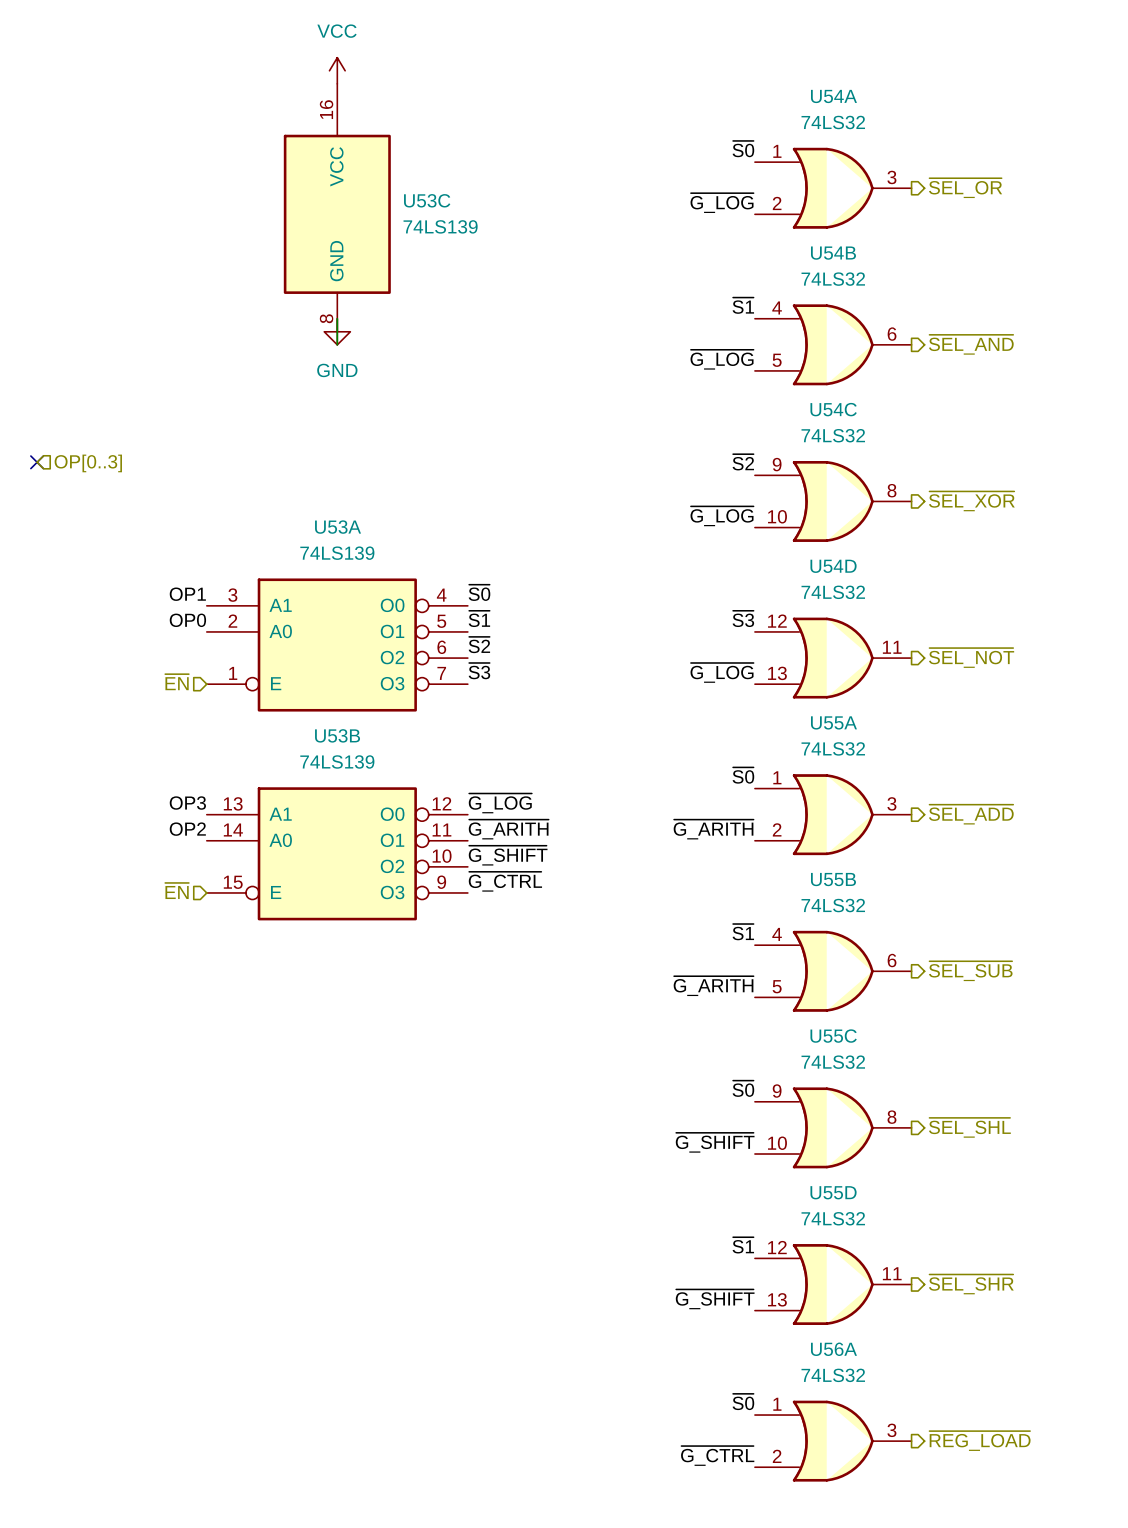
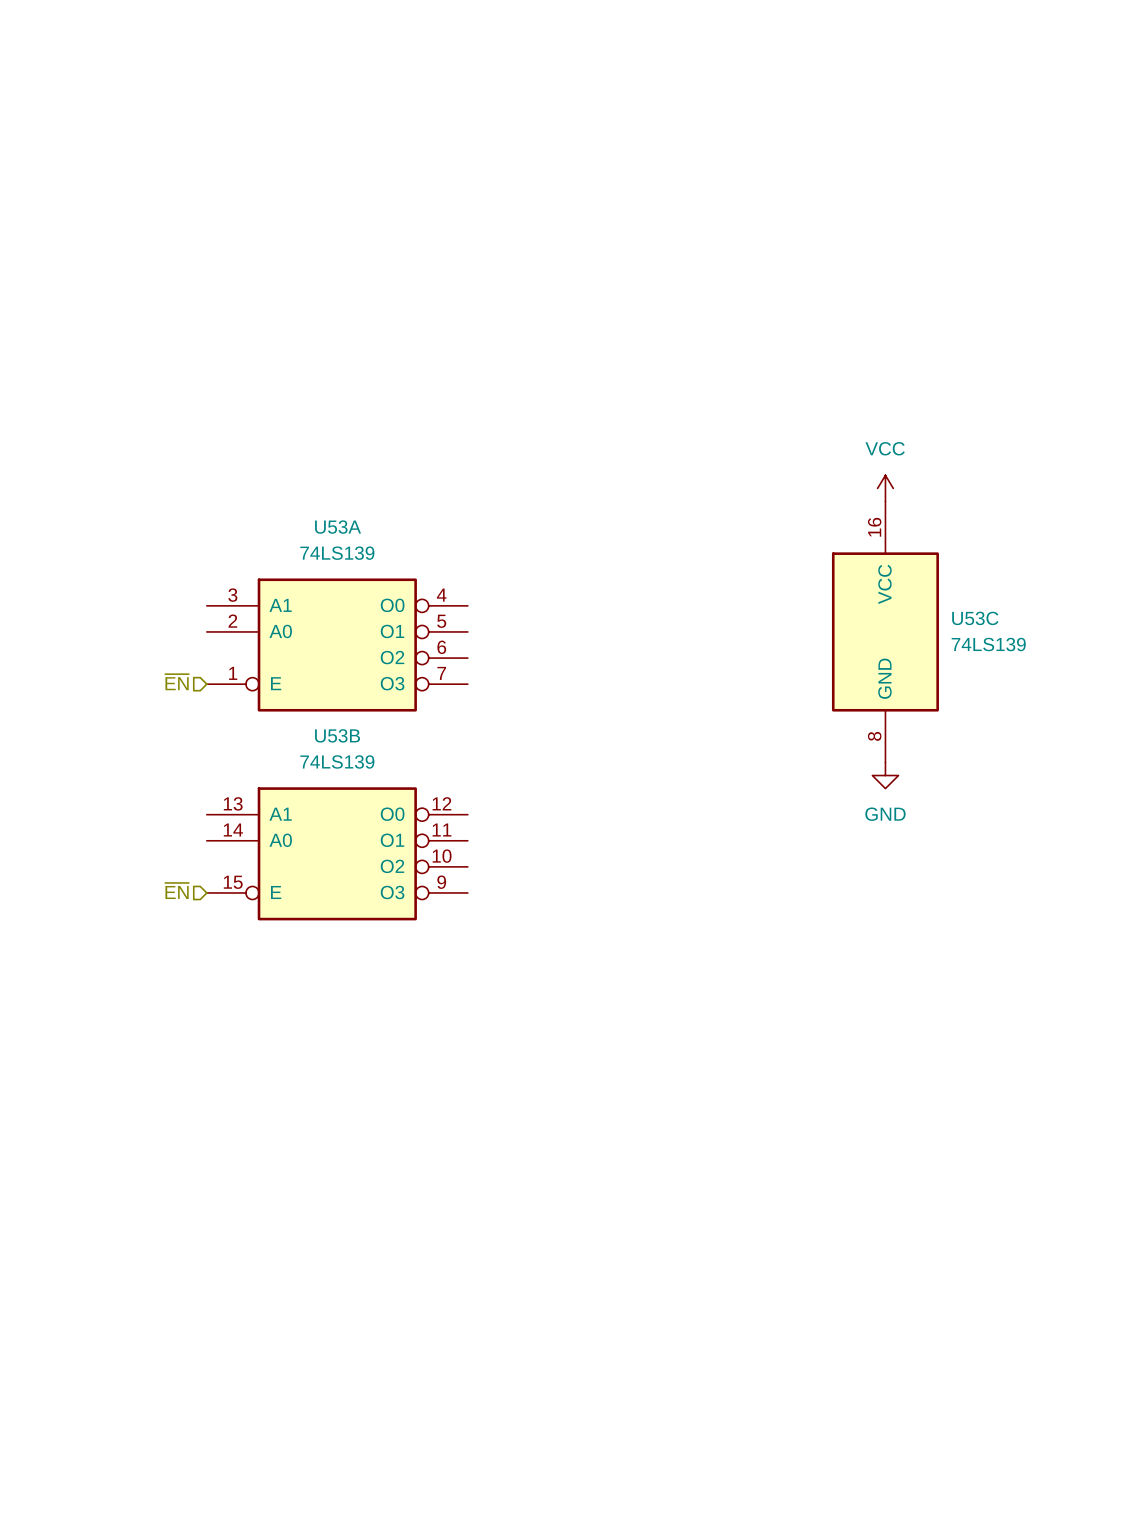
power symbol: VCC (337, 70) -> none
label: ~{S0} (743, 149) -> none
U54A: 74LS32 (833, 188) -> none
hierarchical label: ~{SEL_OR} (965, 188) -> none
label: ~{G_LOG} (722, 203) -> none
U53C position: (337, 214) -> (885, 631)
label: ~{S1} (743, 305) -> none
wire: (337, 318) (337, 344) -> none
power symbol: GND (337, 331) -> none
U54B: 74LS32 (833, 344) -> none
hierarchical label: ~{SEL_AND} (971, 344) -> none
label: ~{G_LOG} (722, 359) -> none
no-connect mark: (37, 462) -> none
label: ~{S2} (743, 462) -> none
hierarchical label: OP[0..3] (88, 463) -> none
power symbol: none -> VCC (885, 488)
U54C: 74LS32 (833, 501) -> none
hierarchical label: ~{SEL_XOR} (971, 501) -> none
label: ~{G_LOG} (722, 516) -> none
label: ~{S0} (479, 592) -> none
label: OP1 (187, 594) -> none
label: ~{S1} (479, 618) -> none
label: ~{S3} (743, 618) -> none
label: OP0 (187, 620) -> none
label: ~{S2} (479, 645) -> none
hierarchical label: ~{SEL_NOT} (971, 657) -> none
U54D: 74LS32 (833, 658) -> none
label: ~{S3} (479, 671) -> none
label: ~{G_LOG} (722, 672) -> none
label: ~{S0} (743, 775) -> none
power symbol: none -> GND (885, 775)
label: OP3 (187, 803) -> none
label: ~{G_LOG} (500, 803) -> none
U55A: 74LS32 (833, 814) -> none
hierarchical label: ~{SEL_ADD} (971, 814) -> none
label: OP2 (187, 829) -> none
label: ~{G_ARITH} (508, 829) -> none
label: ~{G_ARITH} (713, 829) -> none
label: ~{G_SHIFT} (508, 855) -> none
label: ~{G_CTRL} (505, 881) -> none
label: ~{S1} (743, 932) -> none
U55B: 74LS32 (833, 971) -> none
hierarchical label: ~{SEL_SUB} (970, 971) -> none
label: ~{G_ARITH} (713, 986) -> none
label: ~{S0} (743, 1088) -> none
U55C: 74LS32 (833, 1127) -> none
hierarchical label: ~{SEL_SHL} (969, 1127) -> none
label: ~{G_SHIFT} (715, 1142) -> none
label: ~{S1} (743, 1245) -> none
U55D: 74LS32 (833, 1284) -> none
hierarchical label: ~{SEL_SHR} (971, 1284) -> none
label: ~{G_SHIFT} (715, 1299) -> none
label: ~{S0} (743, 1401) -> none
U56A: 74LS32 (833, 1441) -> none
hierarchical label: ~{REG_LOAD} (979, 1441) -> none
label: ~{G_CTRL} (717, 1455) -> none

